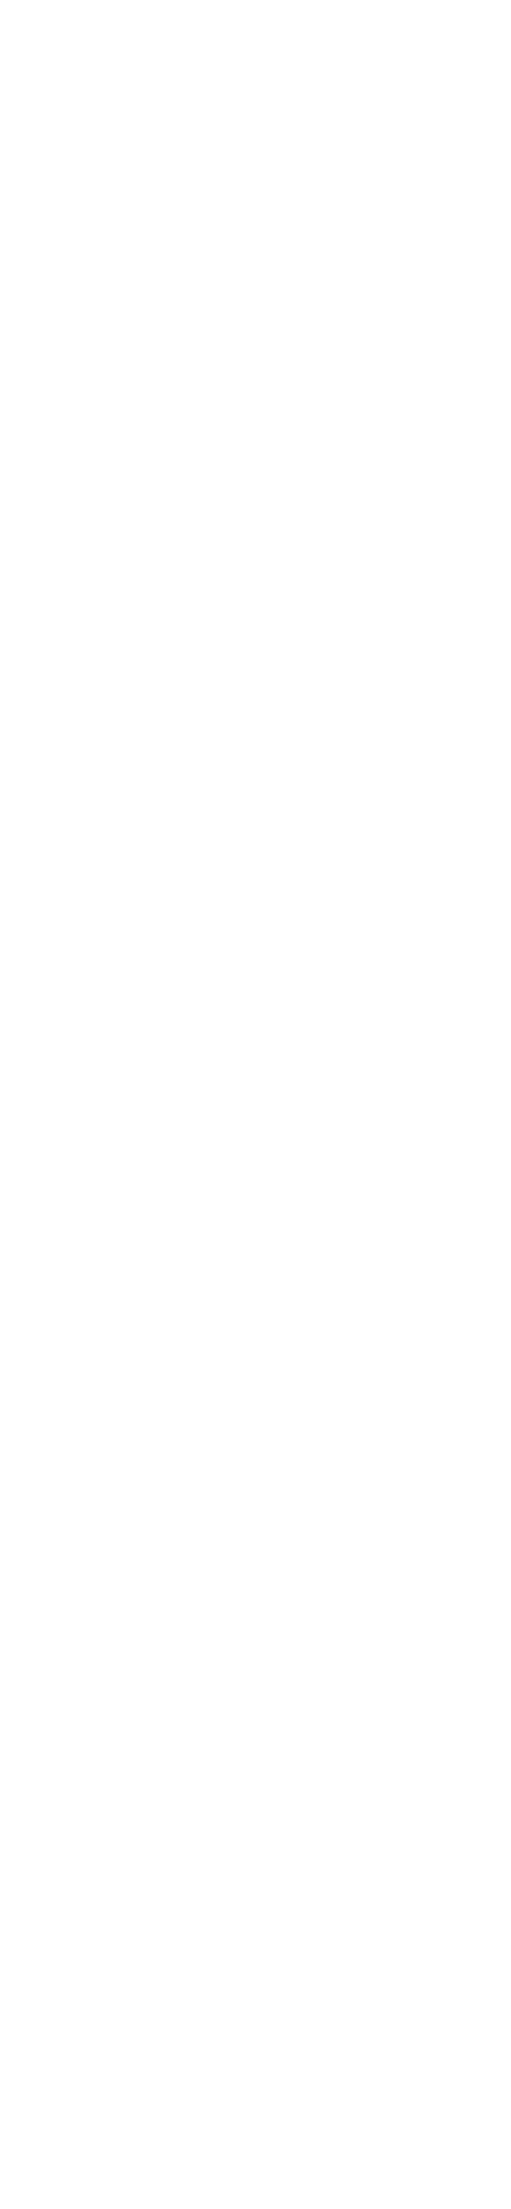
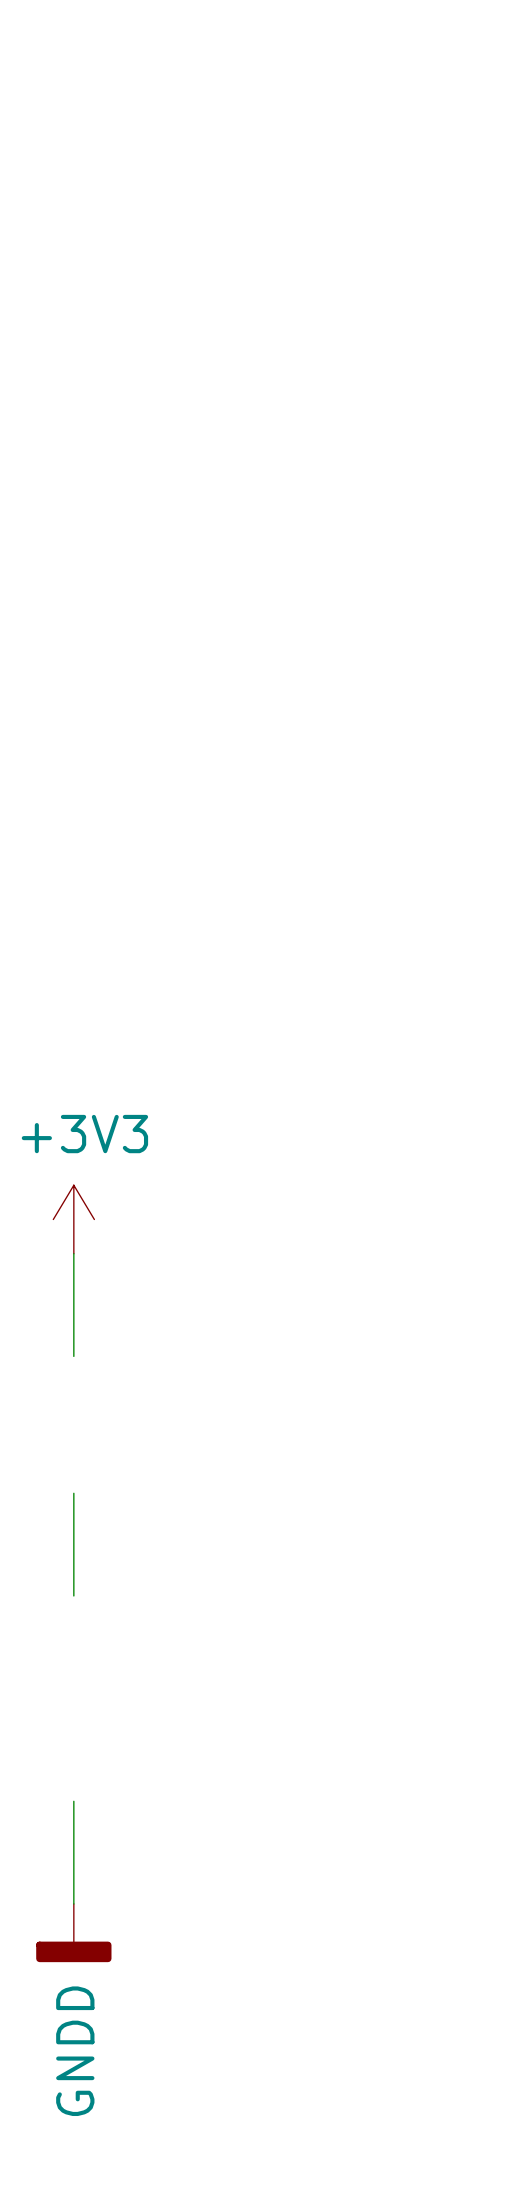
power symbol: none -> +3V3 (73, 1219)
wire: none -> (73, 1253) (73, 1356)
wire: none -> (73, 1493) (73, 1595)
wire: none -> (73, 1801) (73, 1903)
power symbol: none -> GNDD (73, 1933)

